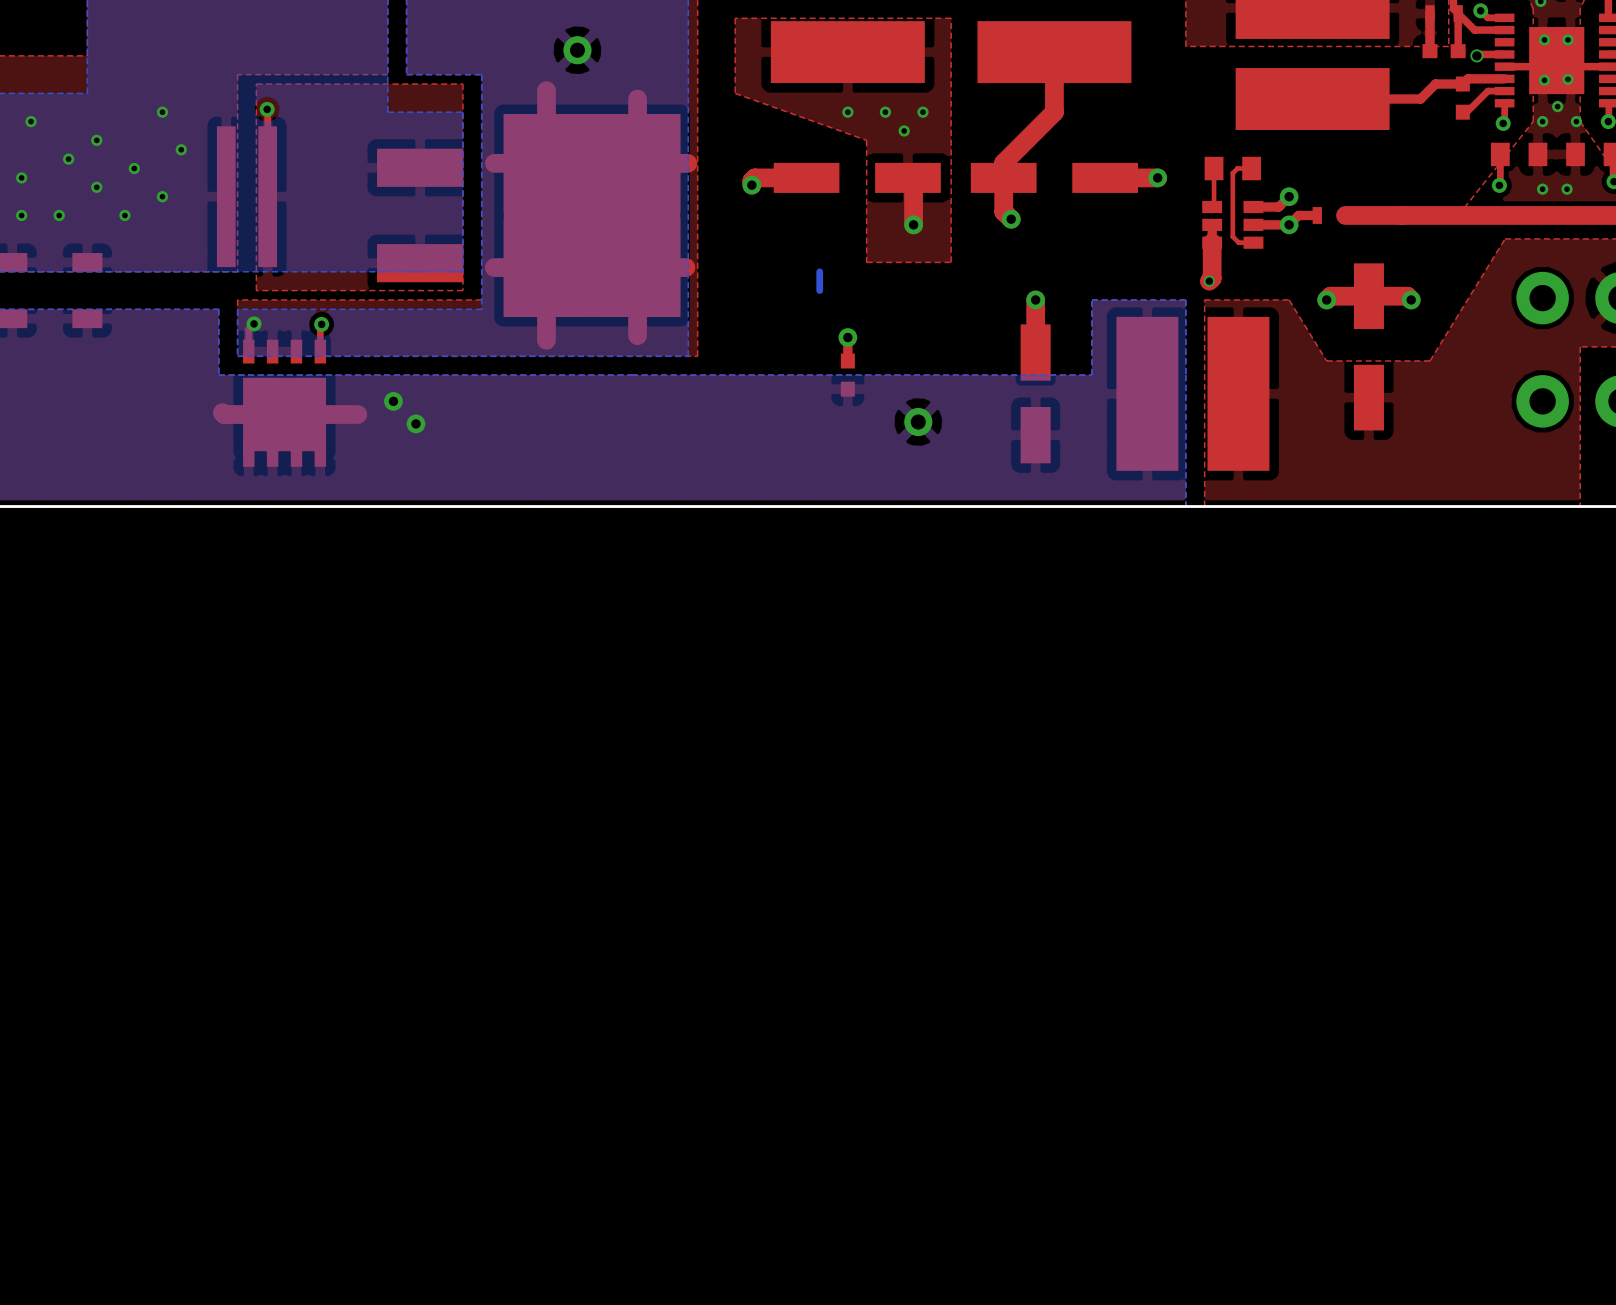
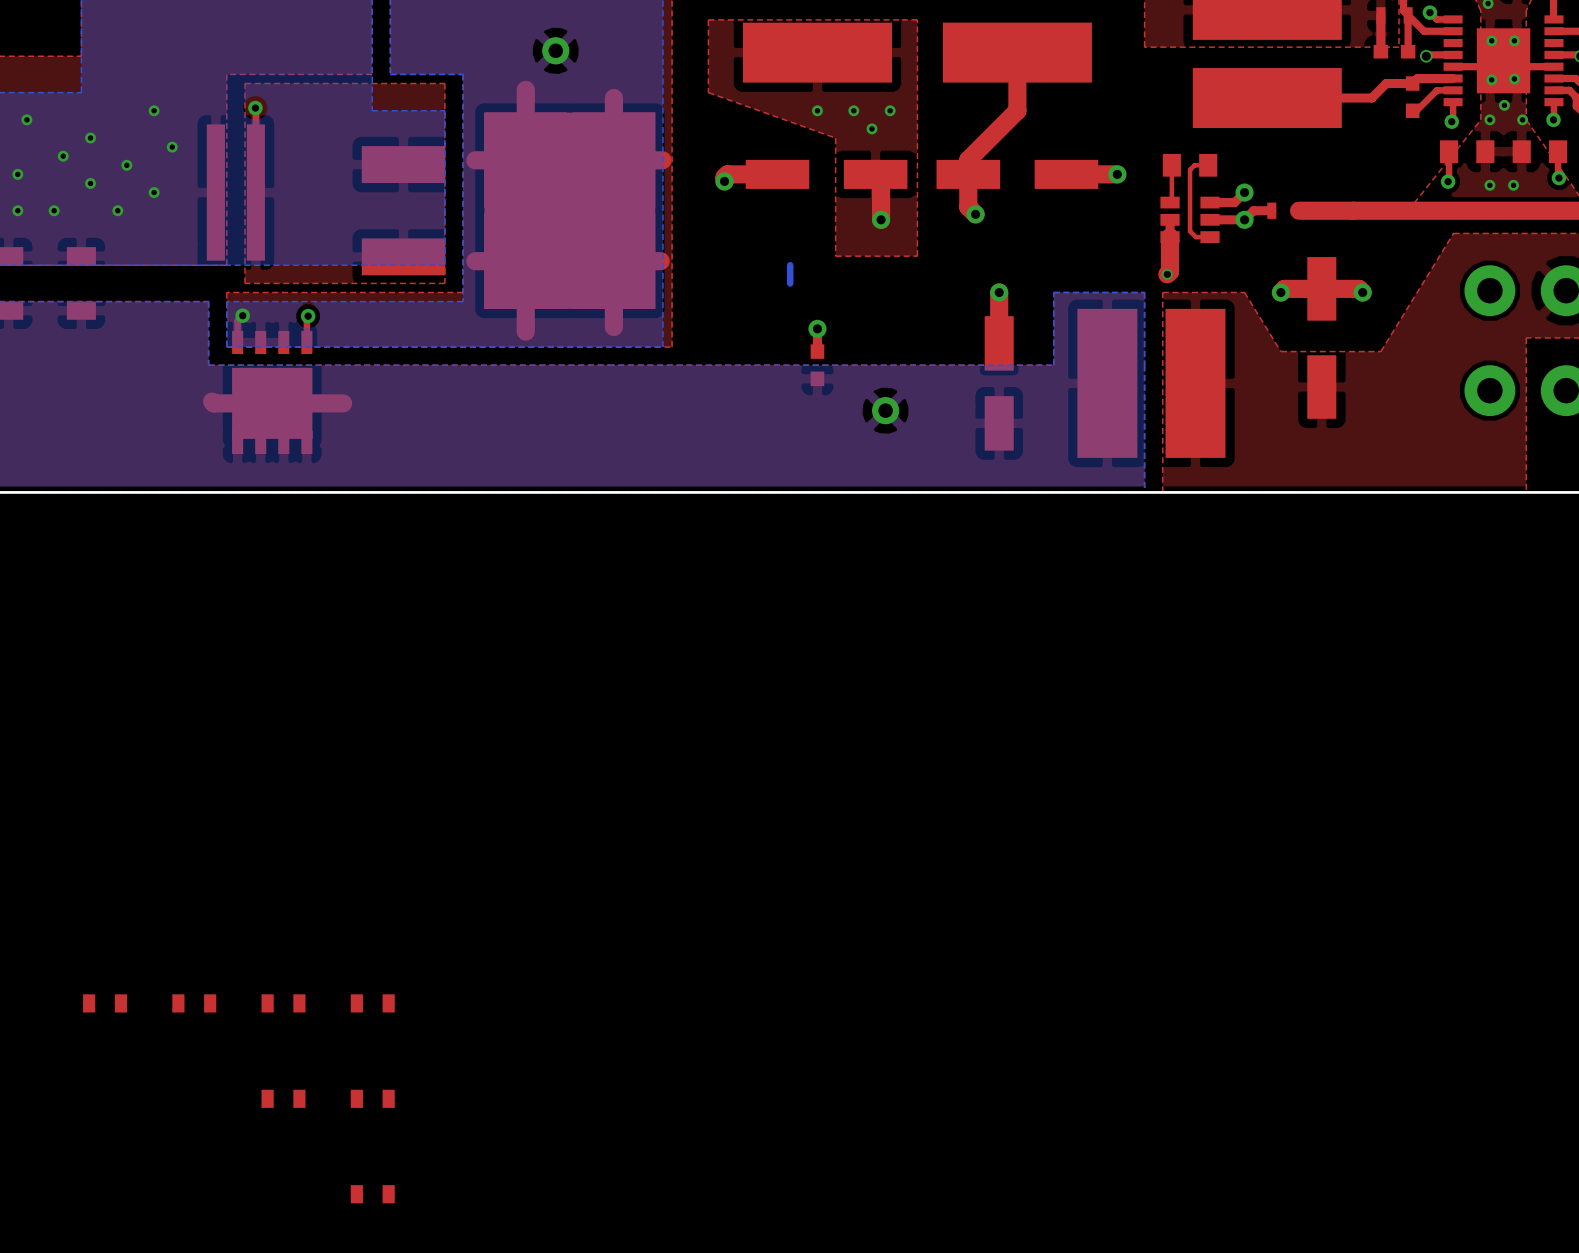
via: (393, 401) -> none
via: (415, 423) -> none
part: none -> (105, 1003)
part: none -> (194, 1003)
part: none -> (283, 1003)
part: none -> (372, 1003)
part: none -> (283, 1098)
part: none -> (372, 1098)
part: none -> (372, 1194)

